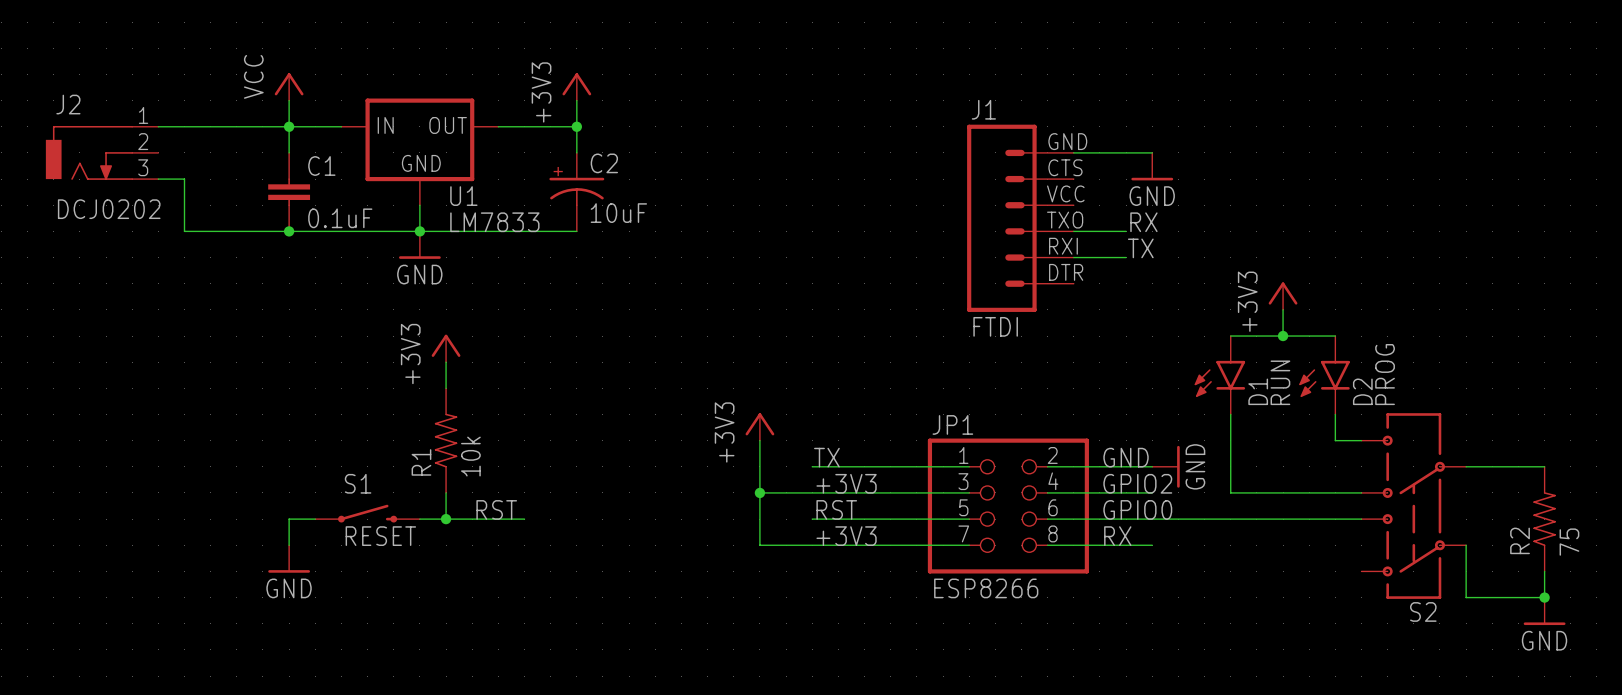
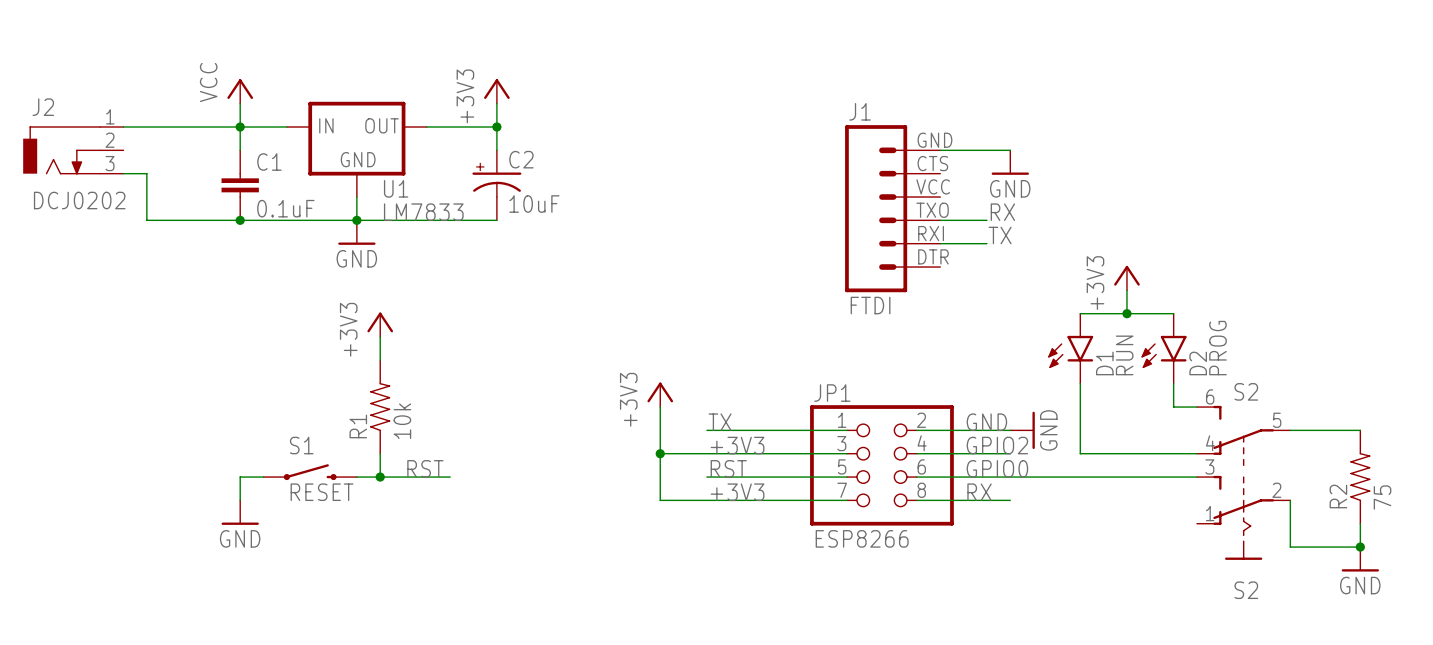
S2: none -> (1243, 435)
S2: (1413, 506) -> none
S2: none -> (1243, 517)

